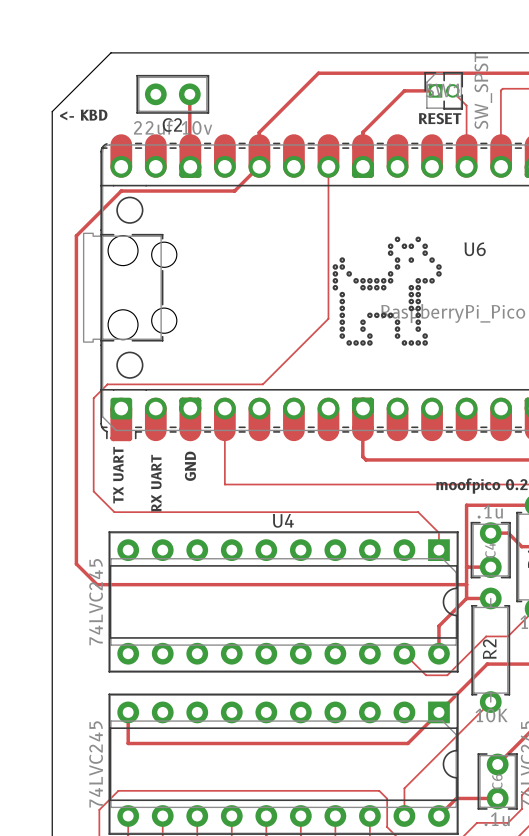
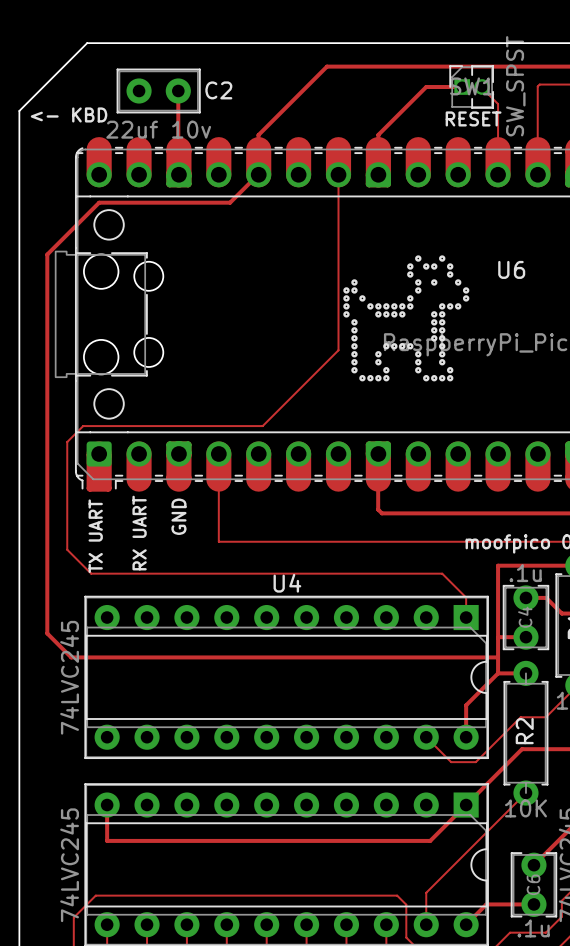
C2 name position: C2 (172, 124) -> C2 (218, 90)

